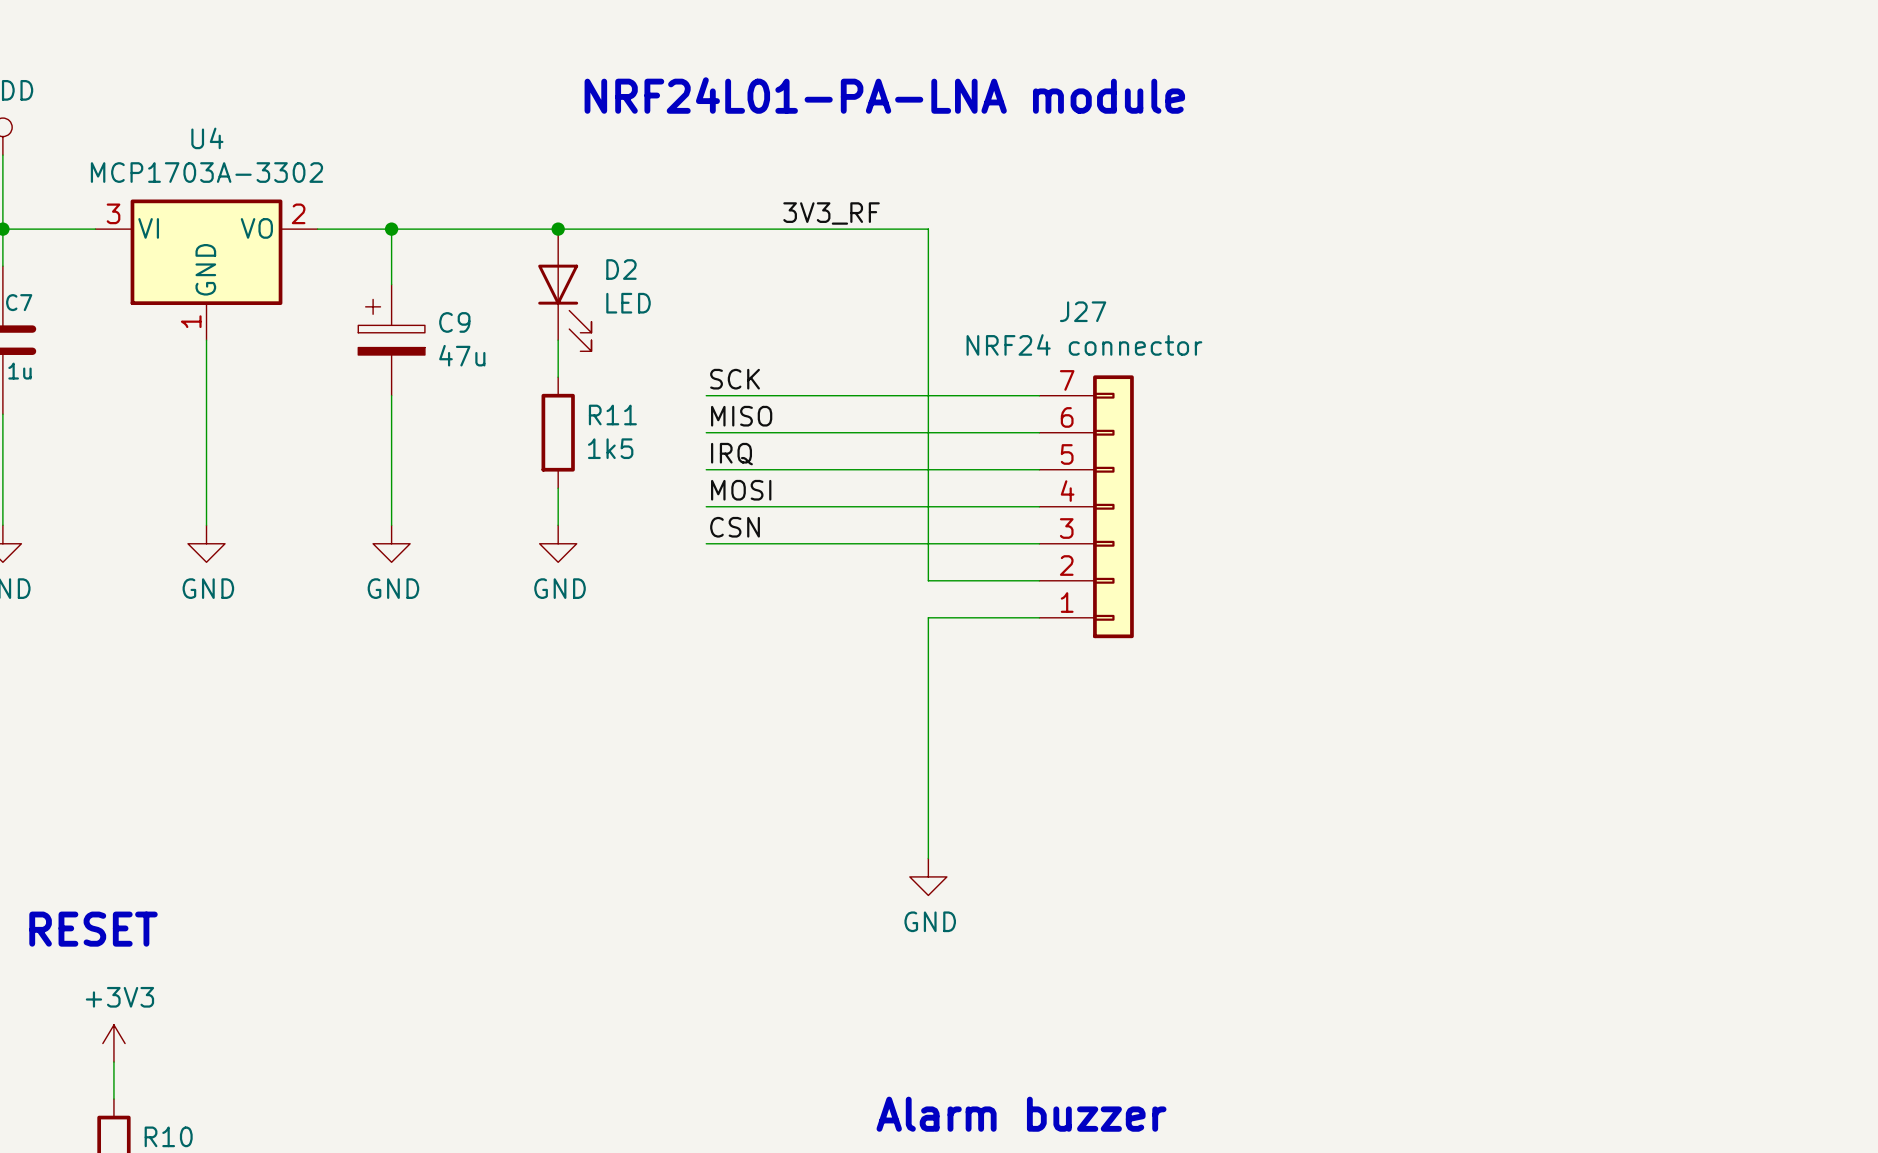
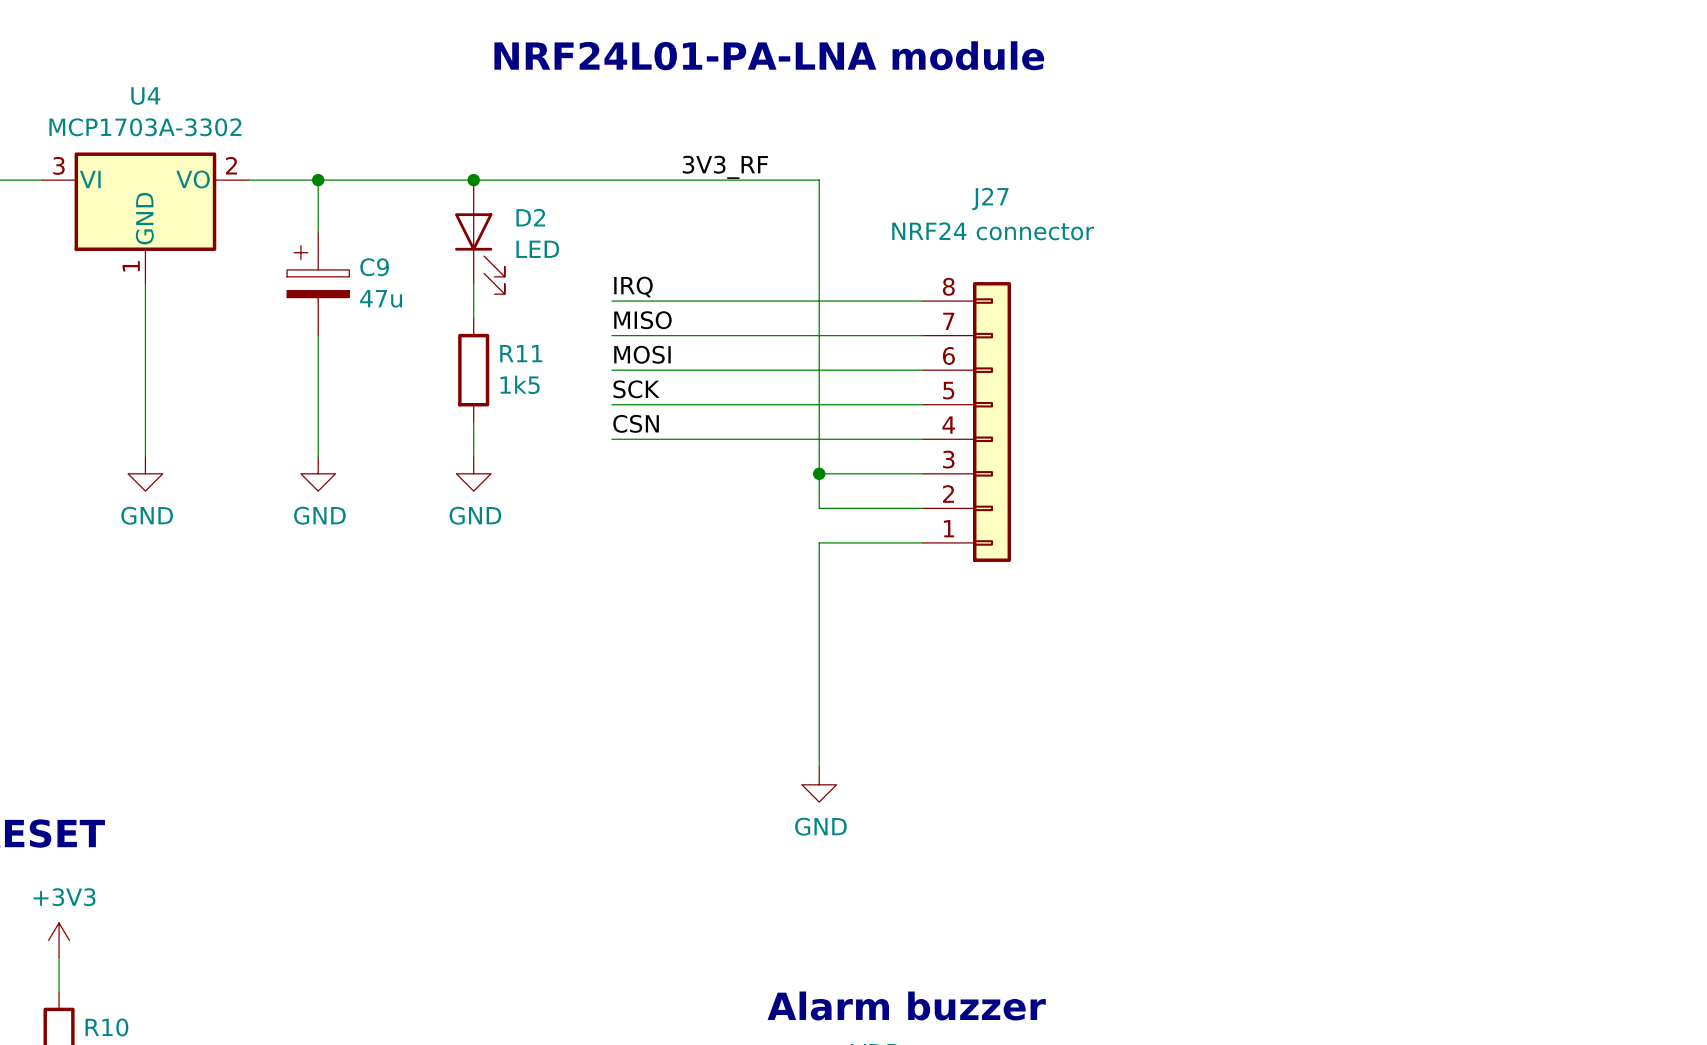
J27 name position: J27 (1083, 311) -> J27 (990, 198)
label: none -> IRQ (633, 287)
J27 value position: NRF24 connector (1084, 344) -> NRF24 connector (993, 231)
wire: none -> (611, 301) (922, 301)
J27 symbol: [1039, 375, 1134, 639] -> [922, 282, 1012, 562]
label: SCK (735, 379) -> MISO (642, 320)
label: MISO (741, 416) -> MOSI (642, 354)
label: IRQ (731, 454) -> SCK (636, 389)
label: MOSI (741, 490) -> CSN (636, 423)
label: CSN (735, 527) -> none
wire: (706, 543) (928, 543) -> none
junction: none -> (819, 473)

